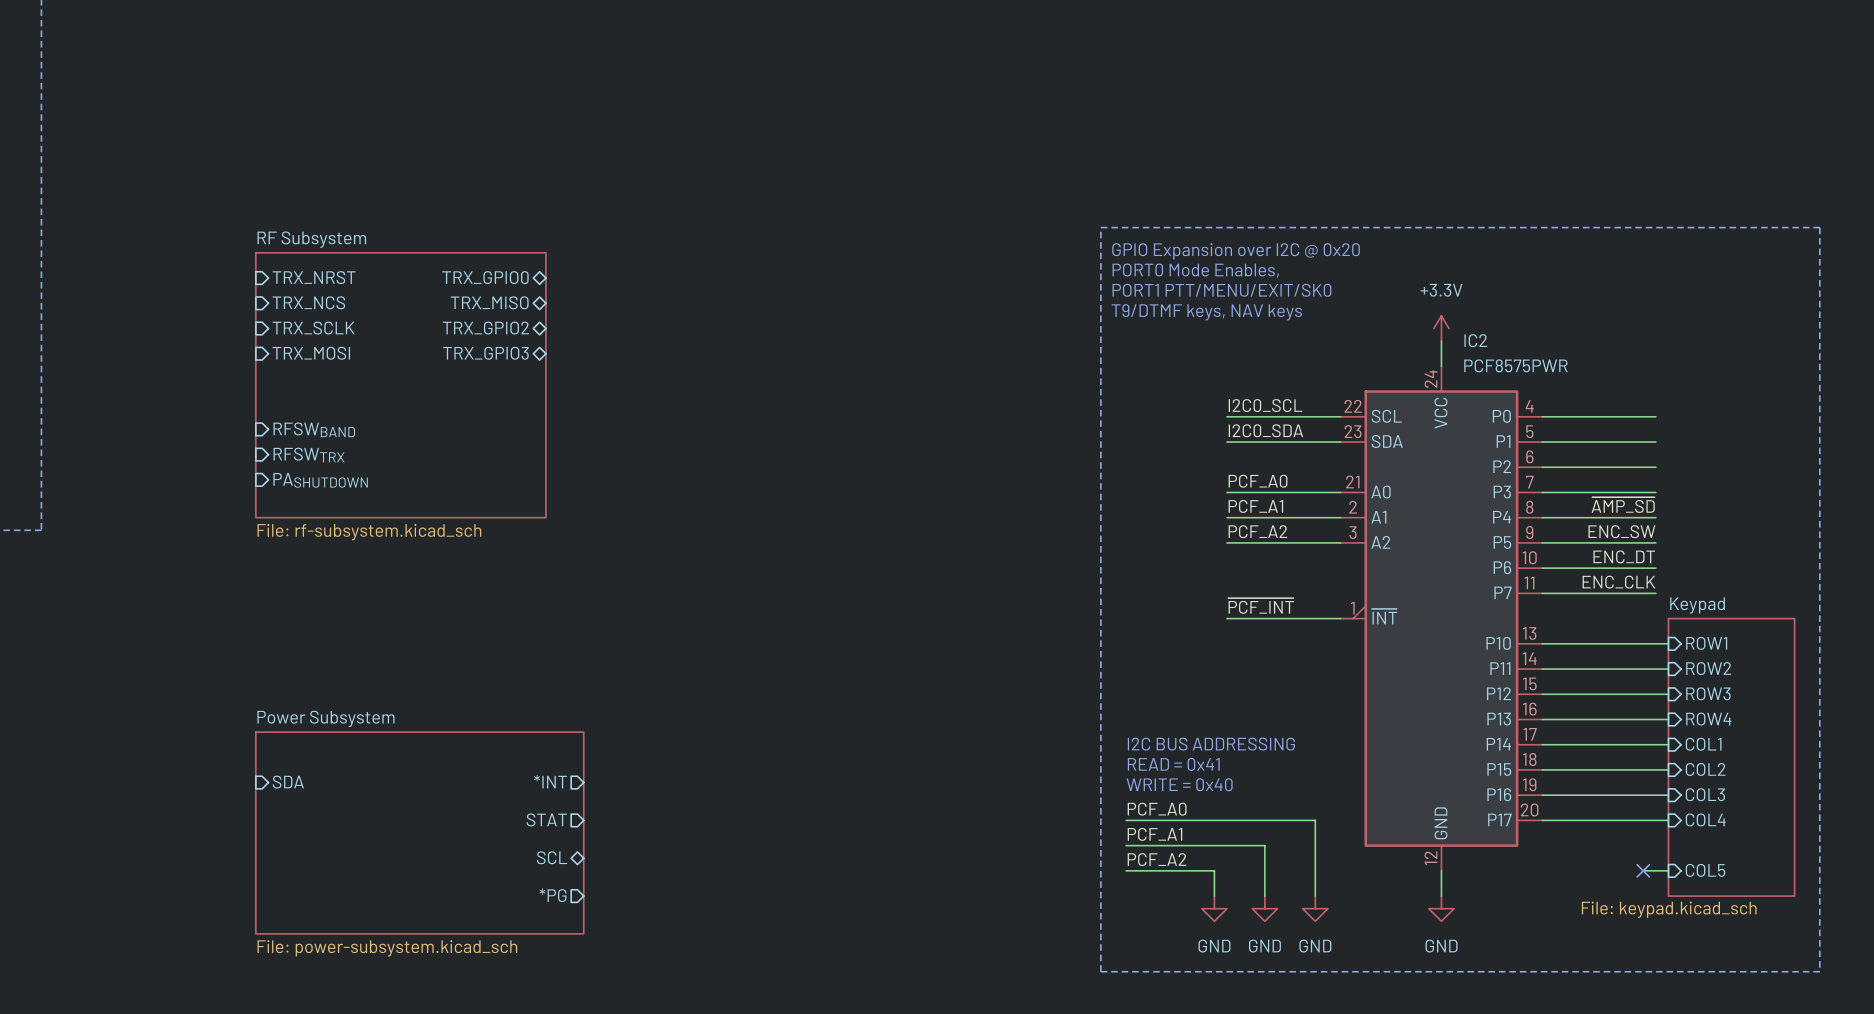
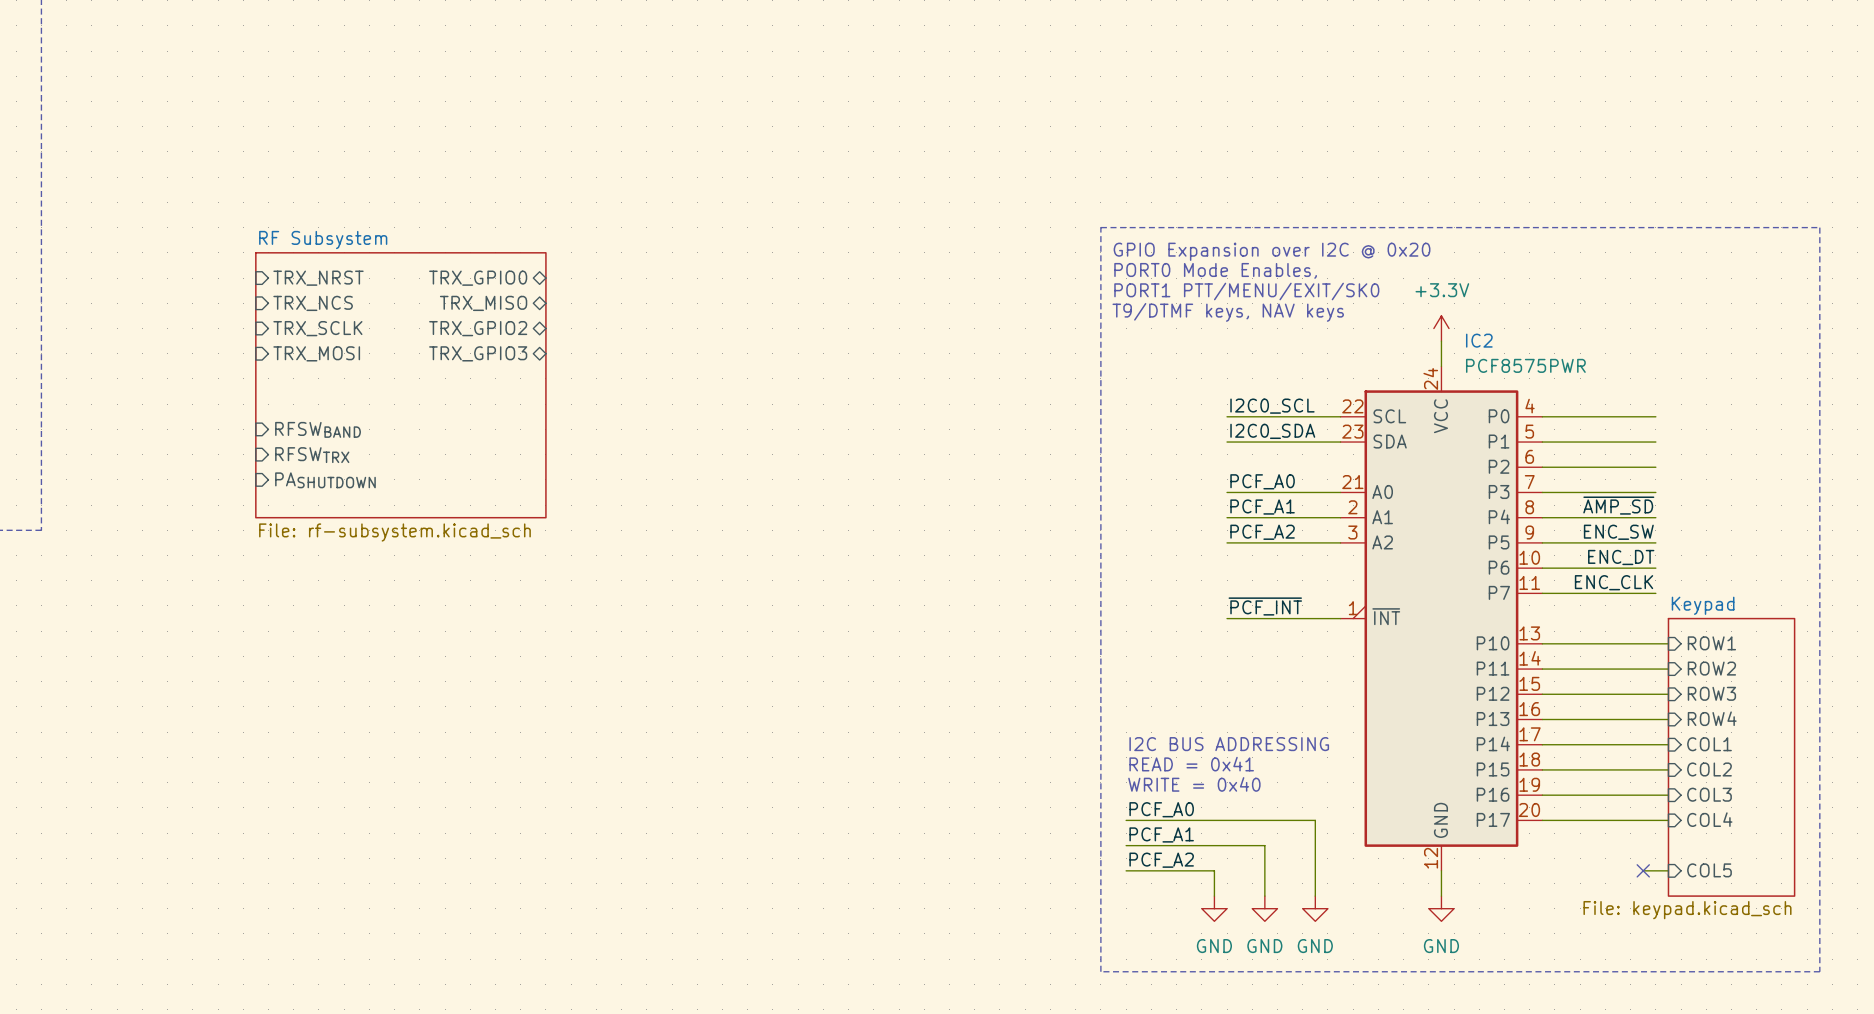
sheet pin: *INT (550, 781) -> none
sheet pin: SDA (288, 782) -> none
sheet pin: STAT (546, 819) -> none
sheet Power Subsystem: File: power-subsystem.kicad_sch (419, 833) -> none
sheet pin: SCL (552, 857) -> none
sheet pin: *PG (552, 895) -> none

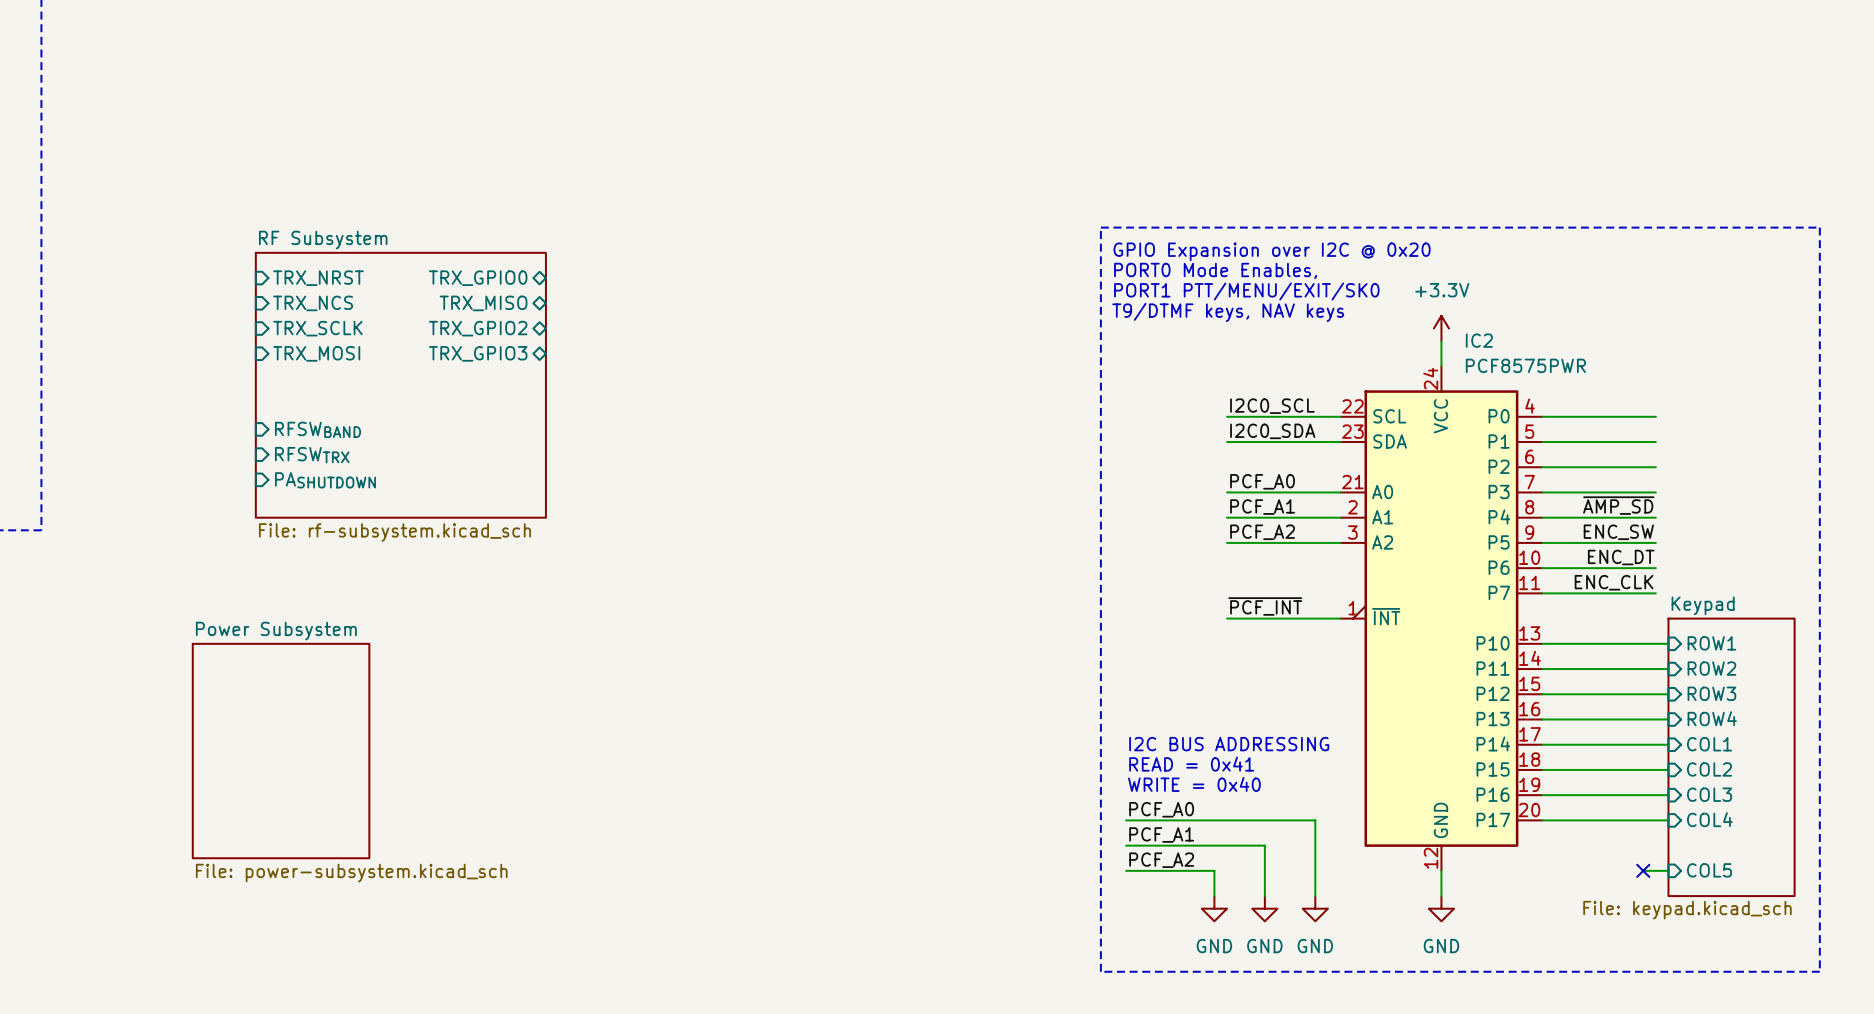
sheet Power Subsystem: none -> File: power-subsystem.kicad_sch (281, 751)

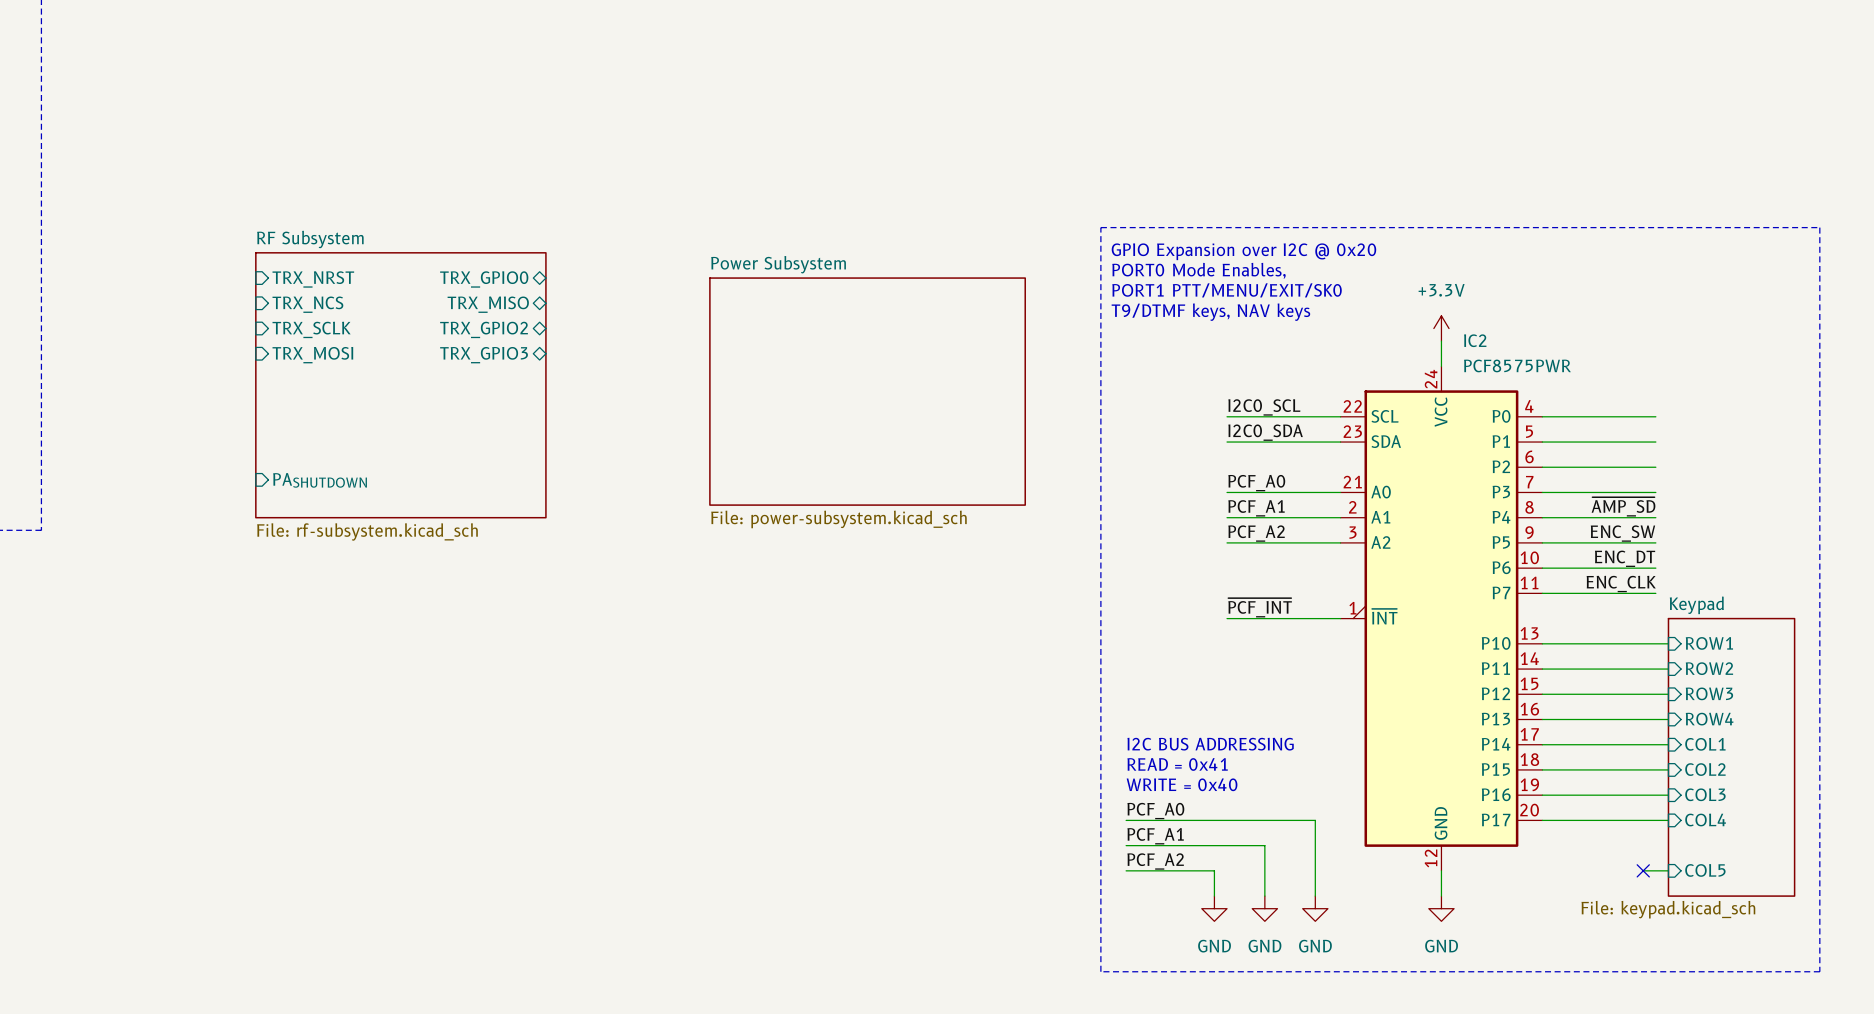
sheet Power Subsystem: none -> File: power-subsystem.kicad_sch (867, 391)
sheet pin: RFSWBAND (318, 429) -> none
sheet pin: RFSWTRX (312, 455) -> none
sheet Power Subsystem: File: power-subsystem.kicad_sch (281, 751) -> none

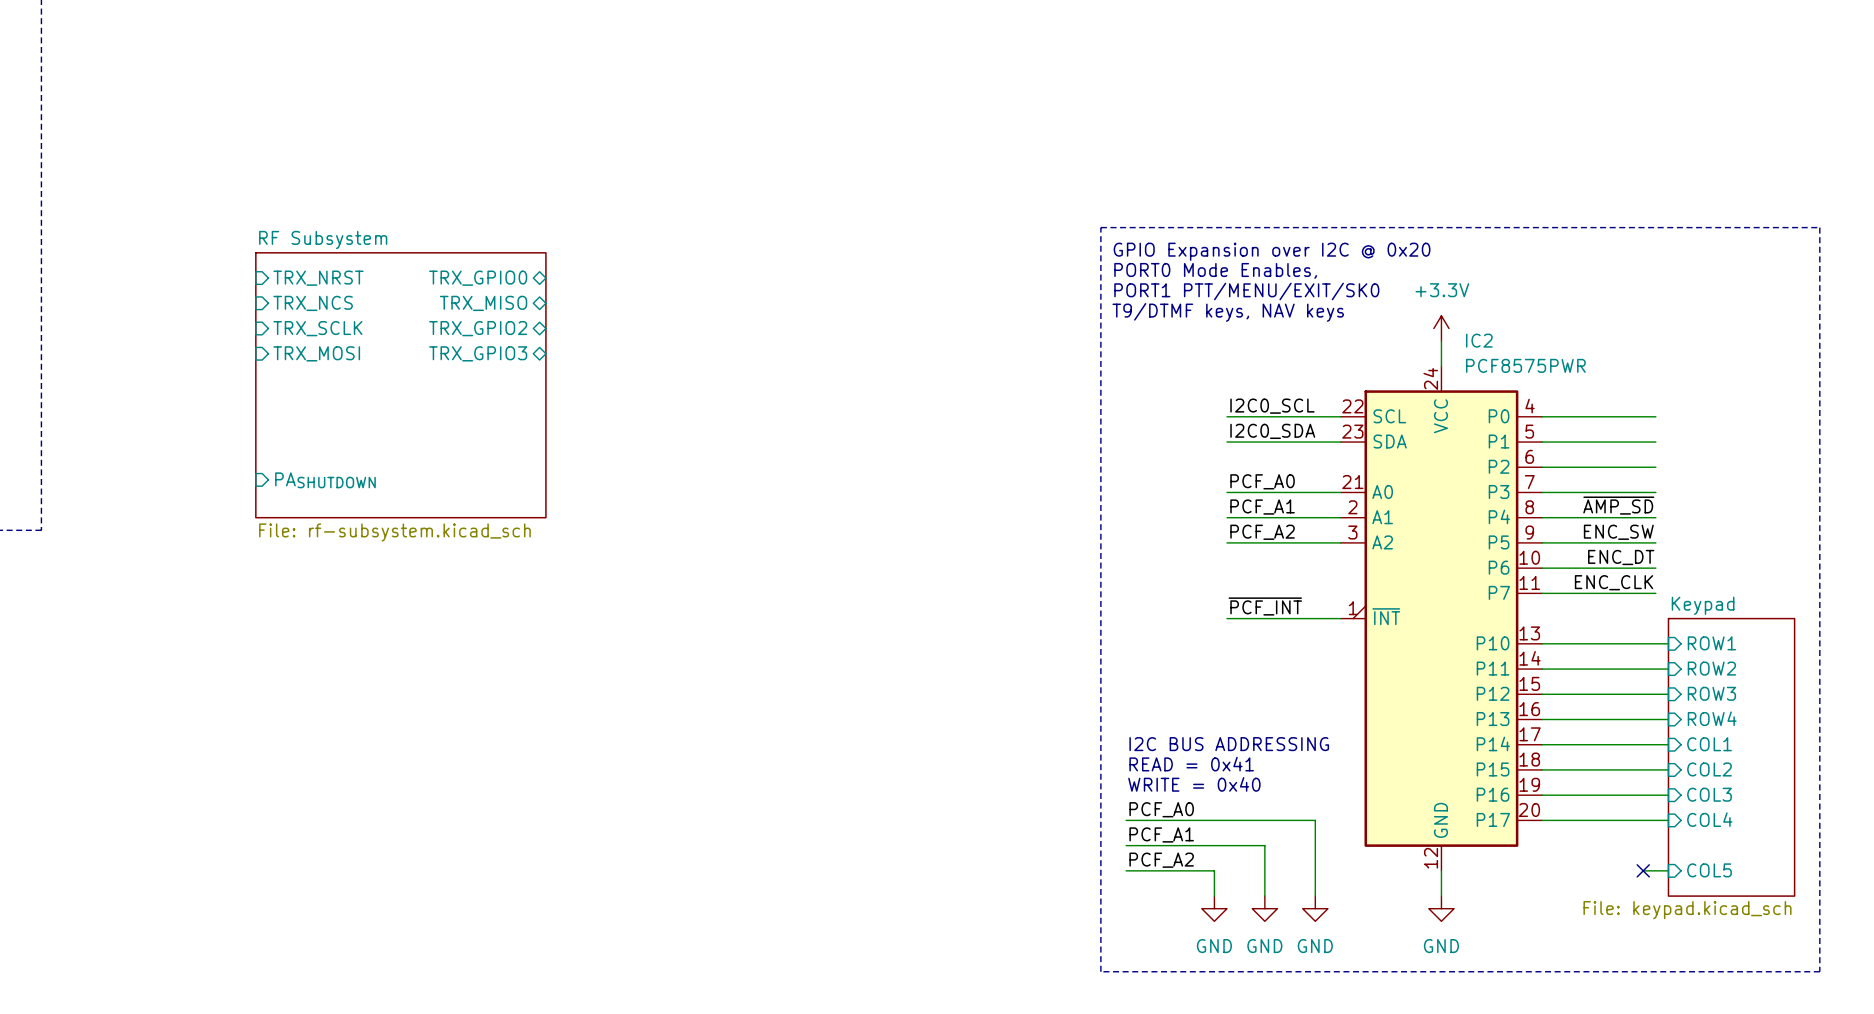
sheet Power Subsystem: File: power-subsystem.kicad_sch (867, 391) -> none

